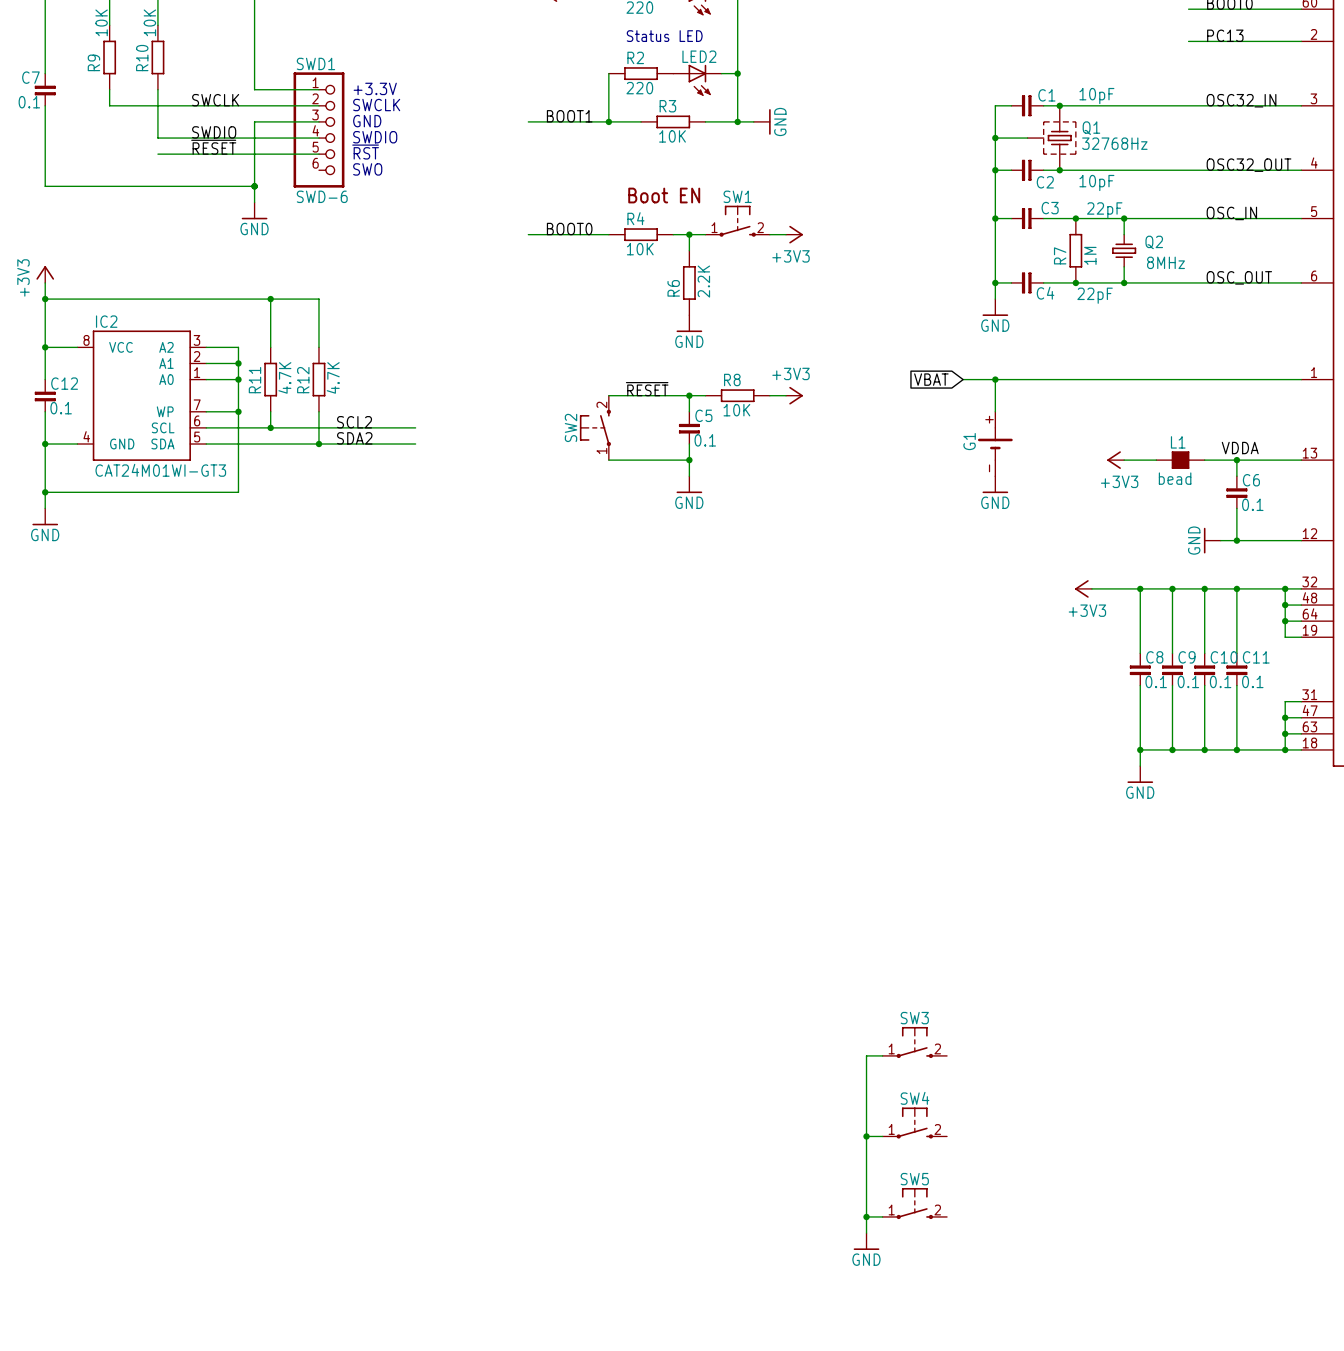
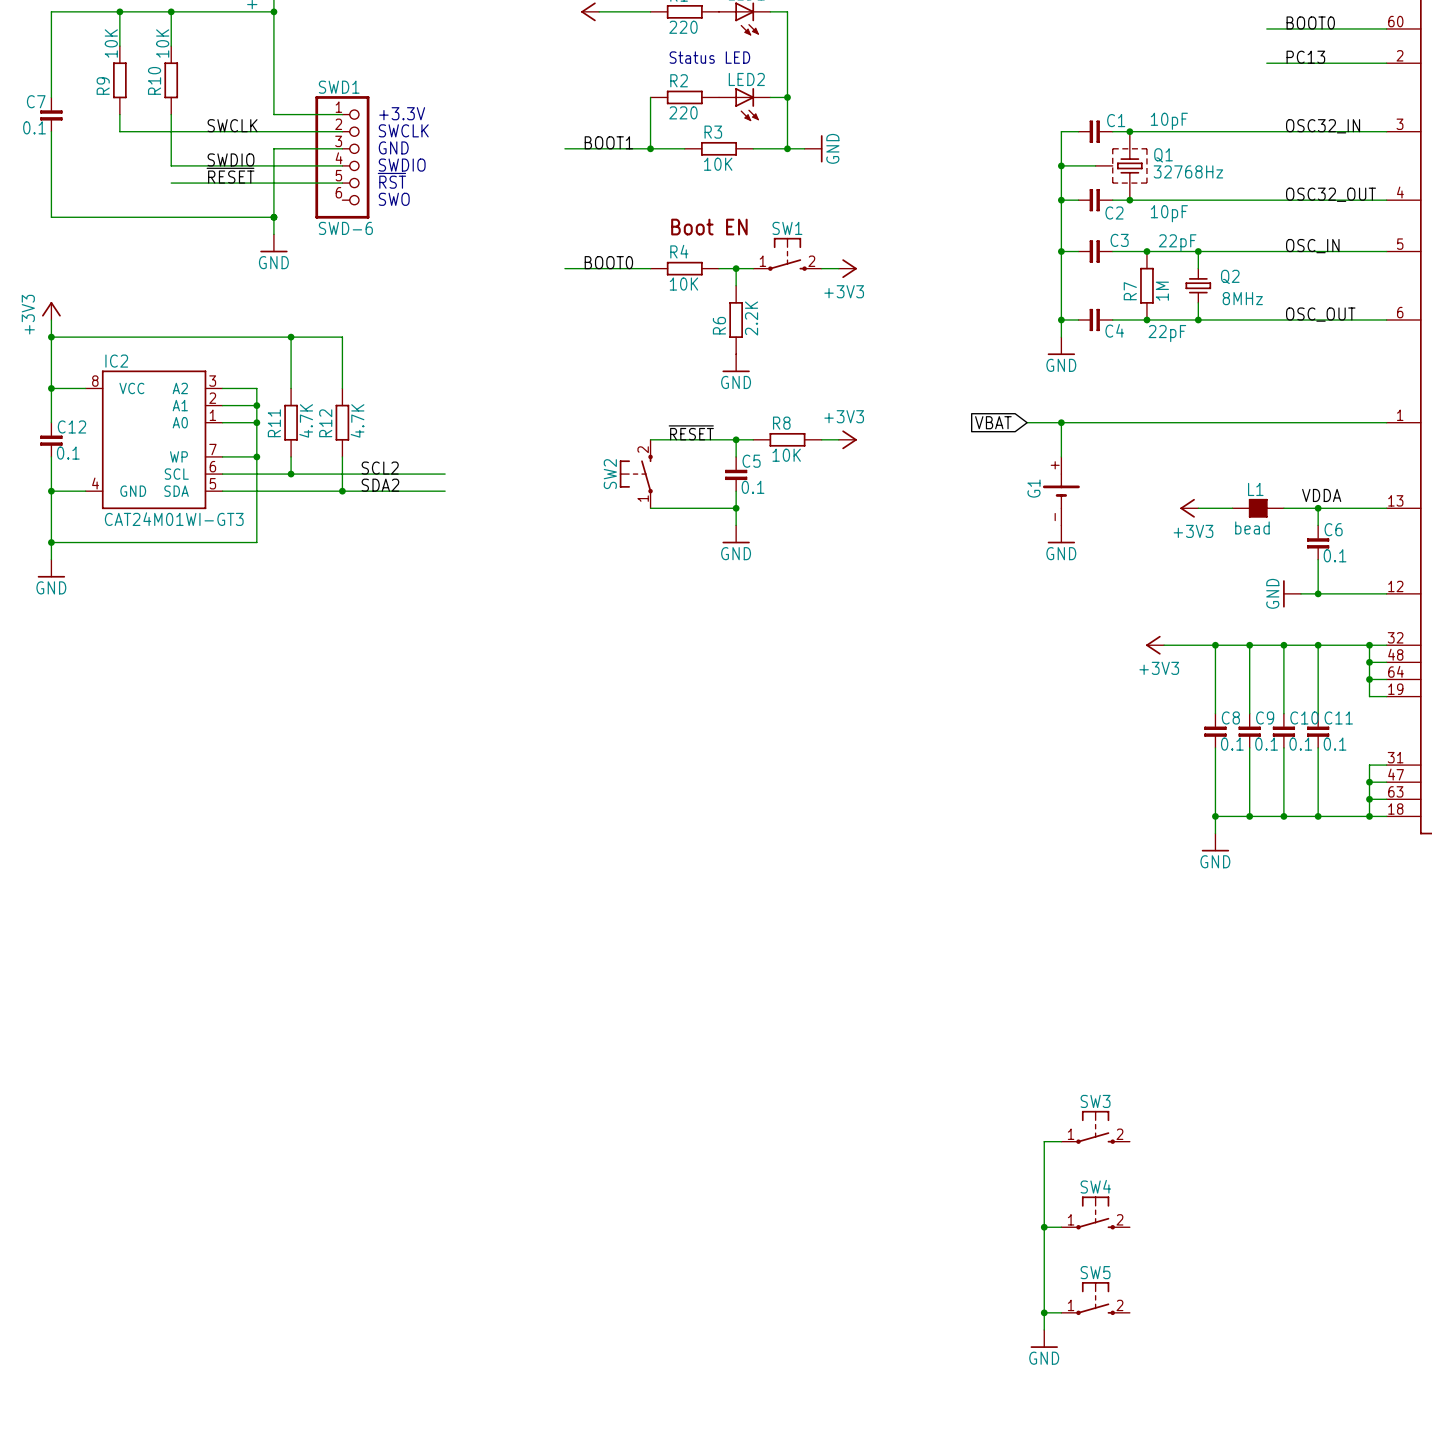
SW3 position: (914, 1042) -> (1095, 1127)
wire: (882, 1055) (866, 1055) (866, 1233) -> (1061, 1141) (1044, 1141) (1044, 1329)
SW4 position: (914, 1123) -> (1095, 1212)
wire: (866, 1136) (882, 1136) -> (1044, 1227) (1061, 1227)
junction: (866, 1136) -> none
junction: none -> (1044, 1227)
SW5 position: (914, 1203) -> (1095, 1298)
wire: (866, 1216) (882, 1216) -> (1044, 1312) (1061, 1312)
junction: (866, 1216) -> none
junction: none -> (1044, 1312)
power symbol position: GND (866, 1241) -> GND (1044, 1338)

